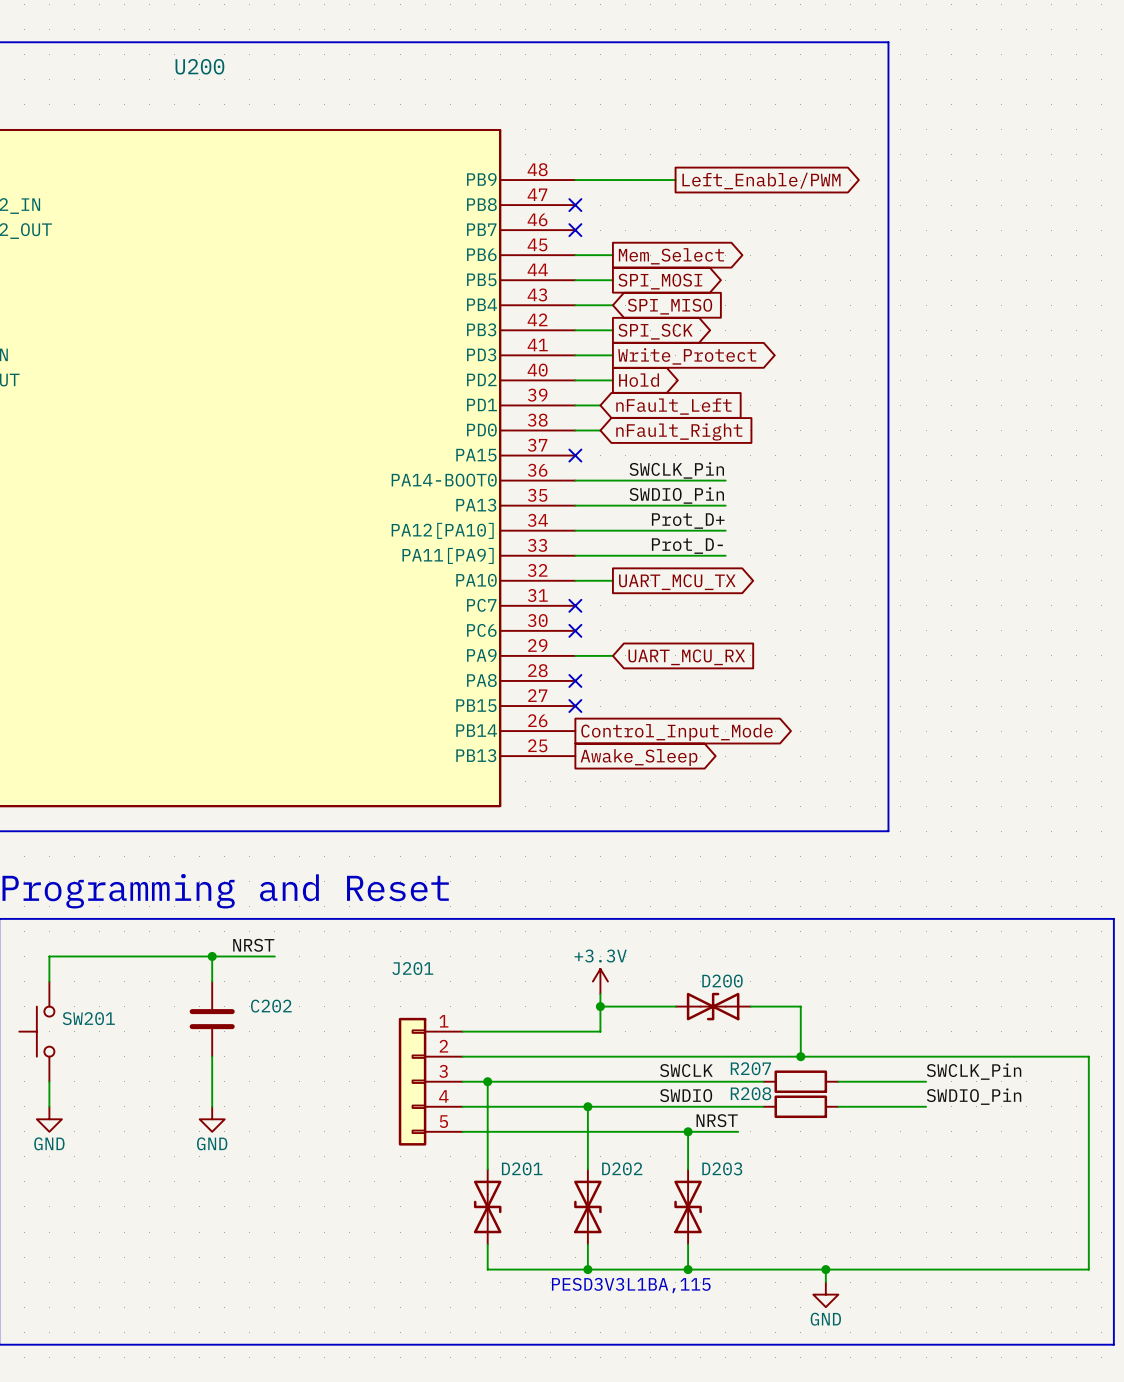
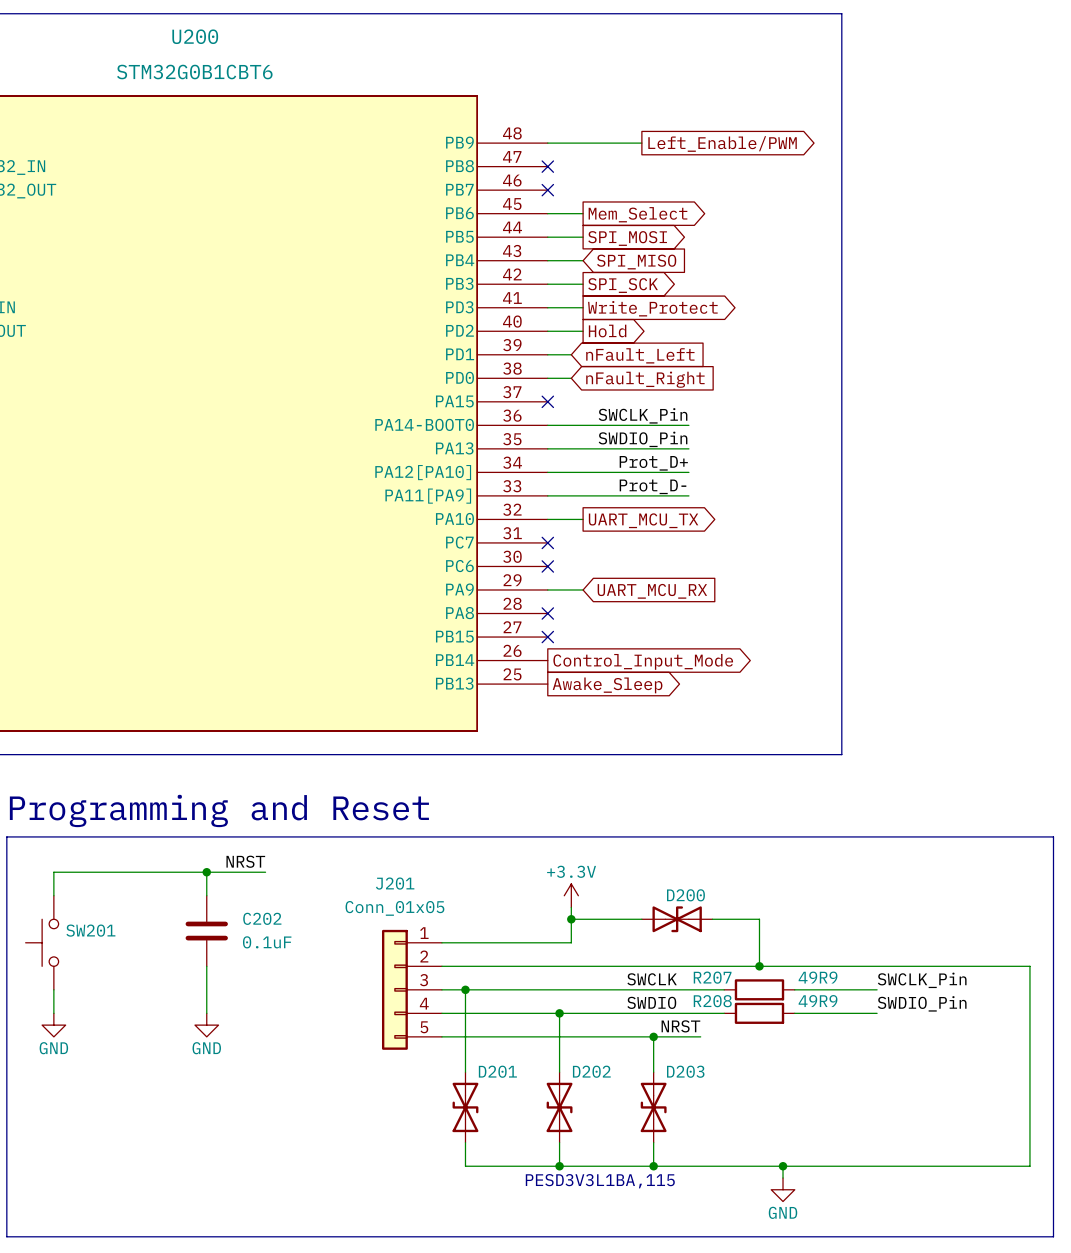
U200 value: none -> STM32G0B1CBT6 (194, 72)
J201 value: none -> Conn_01x05 (394, 908)
C202 value: none -> 0.1uF (267, 942)
R207 value: none -> 49R9 (818, 977)
R208 value: none -> 49R9 (818, 1001)

